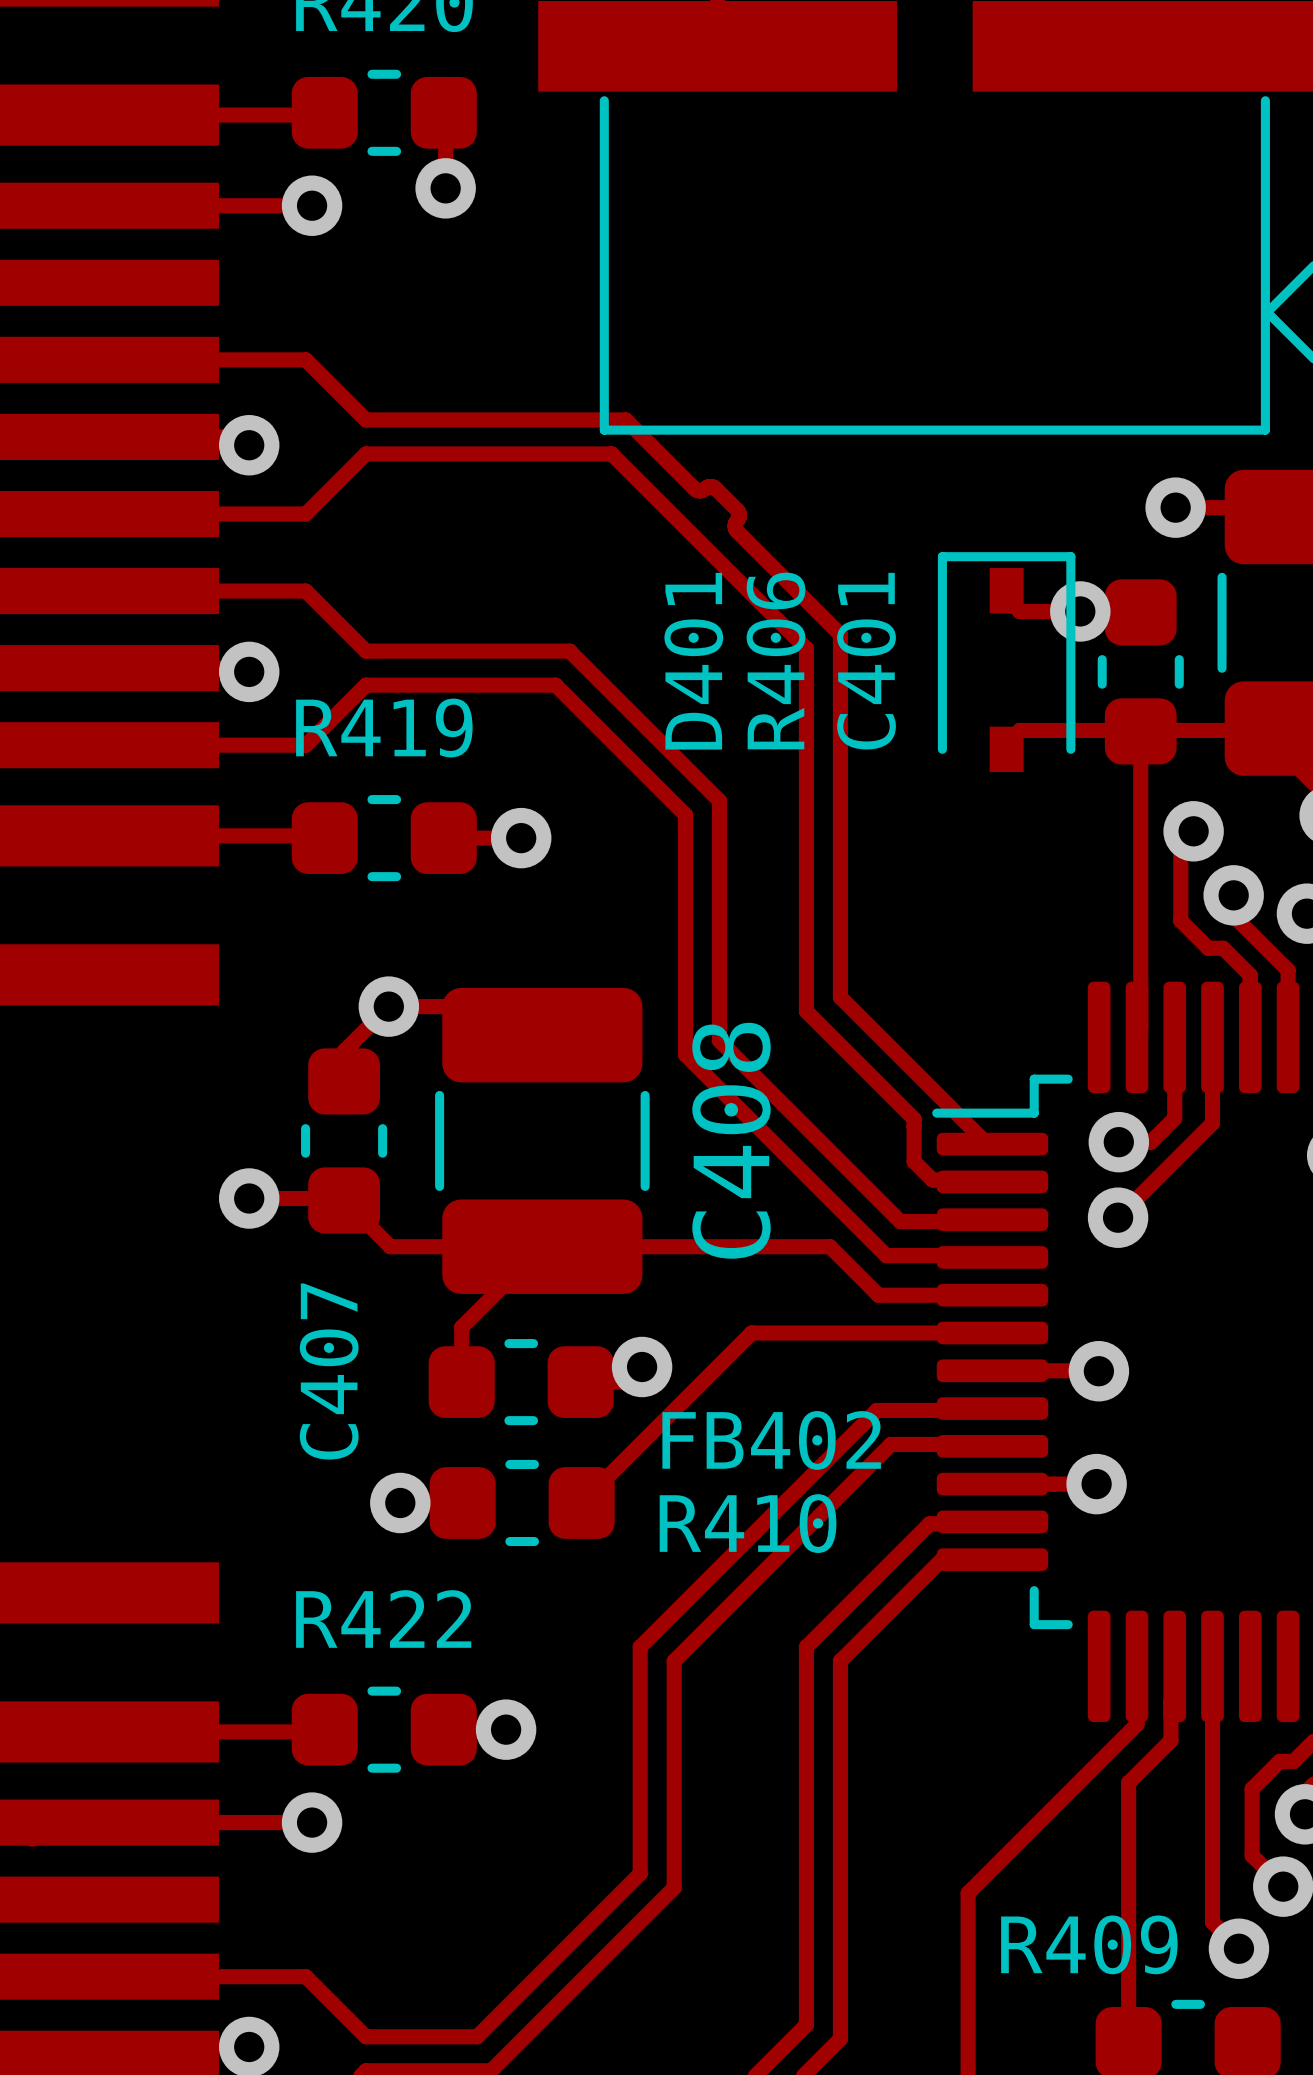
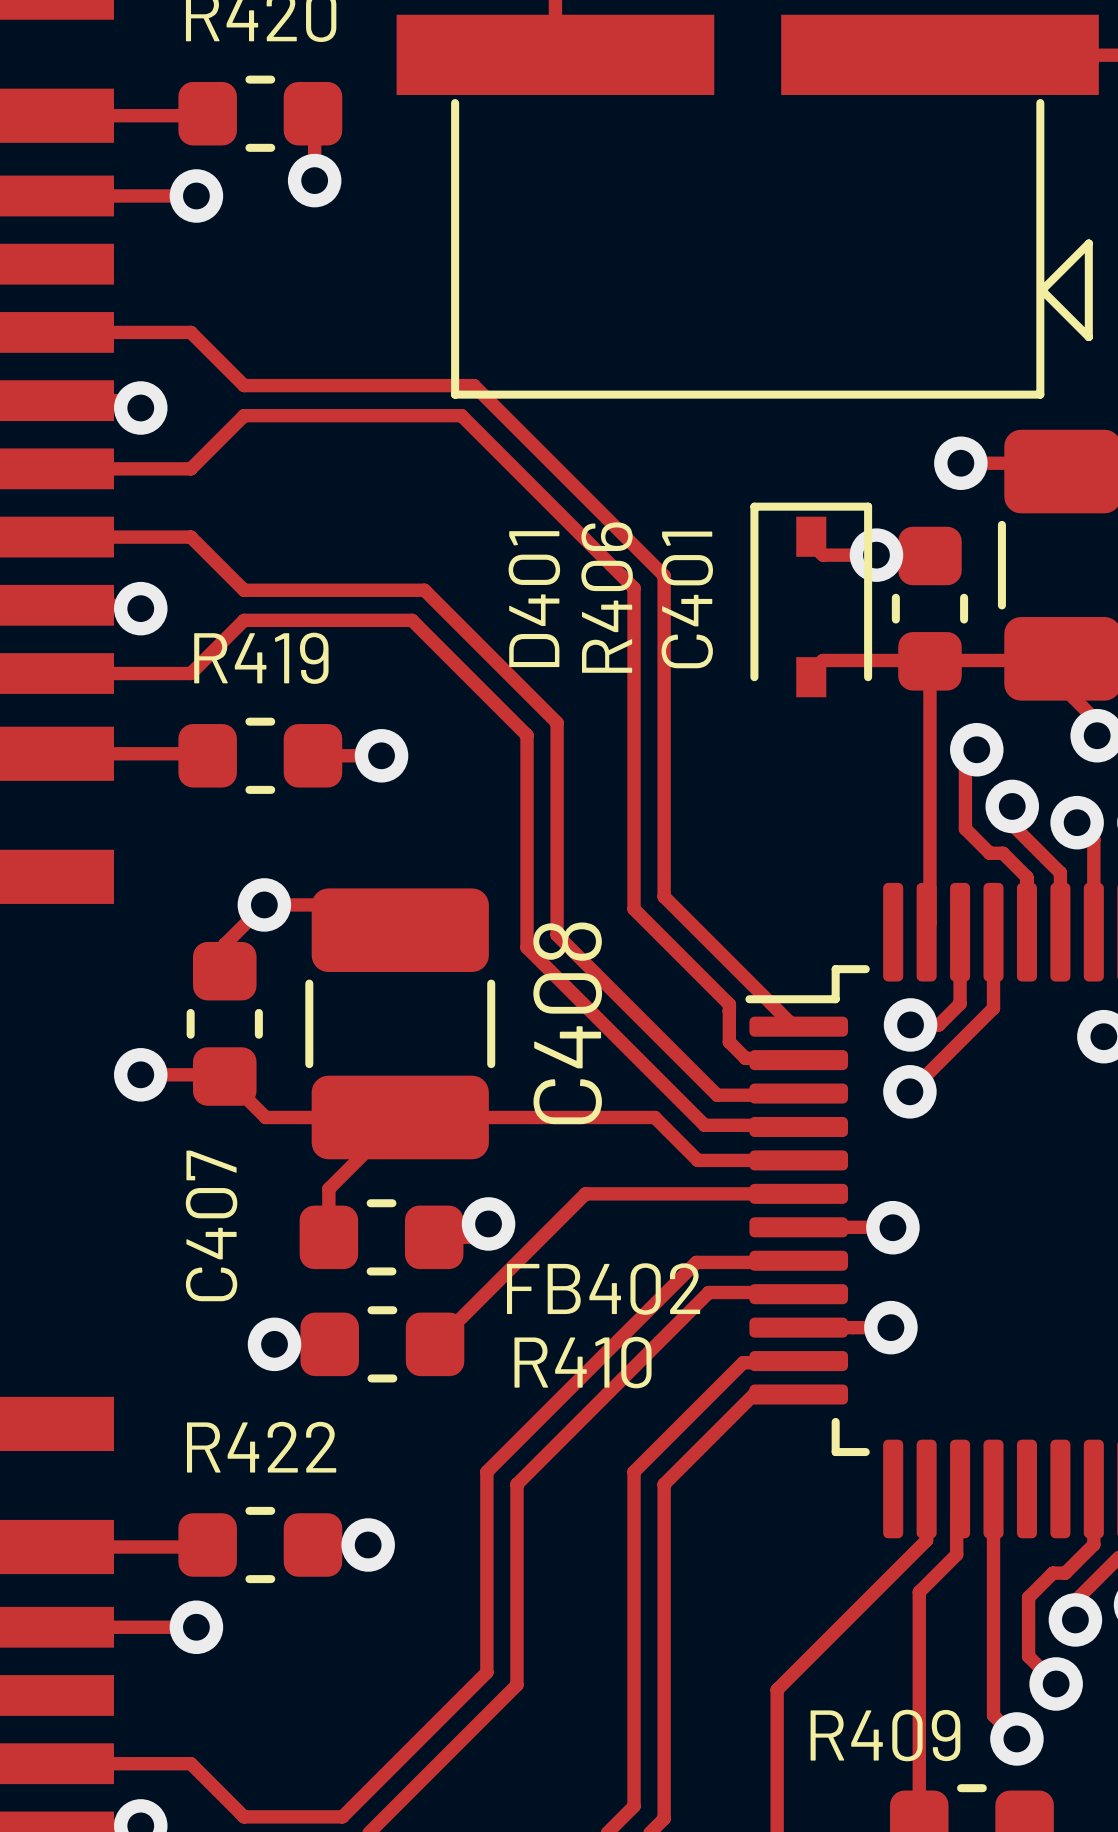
track: (694, 488) (700, 490) (708, 486) (714, 487) (737, 510) (739, 516) (735, 525) (737, 531) -> (534, 446) (572, 484)

